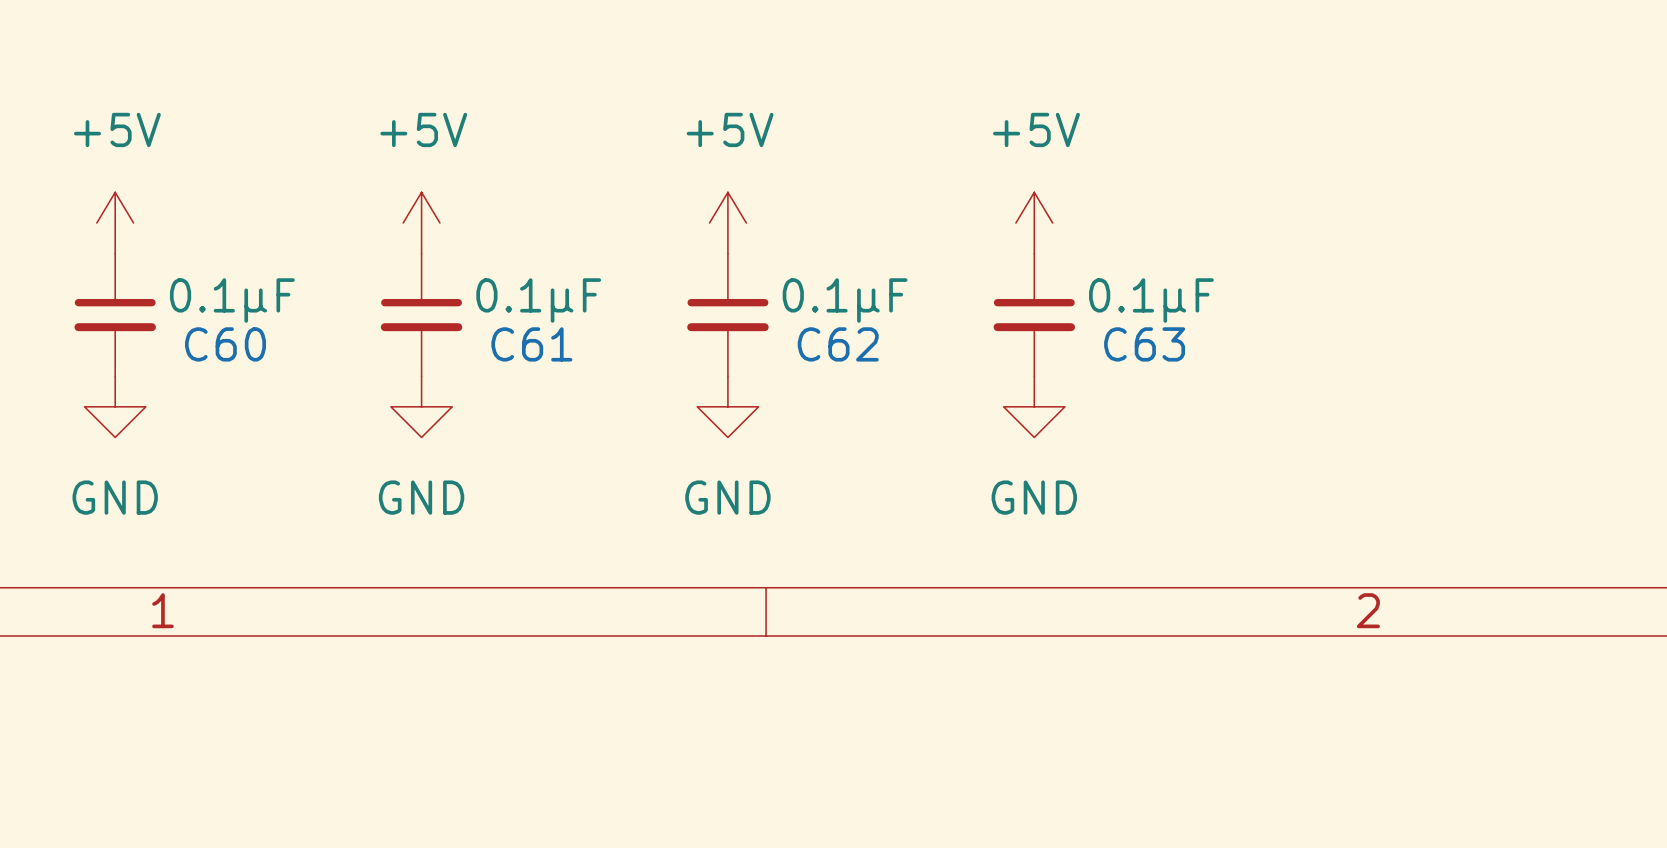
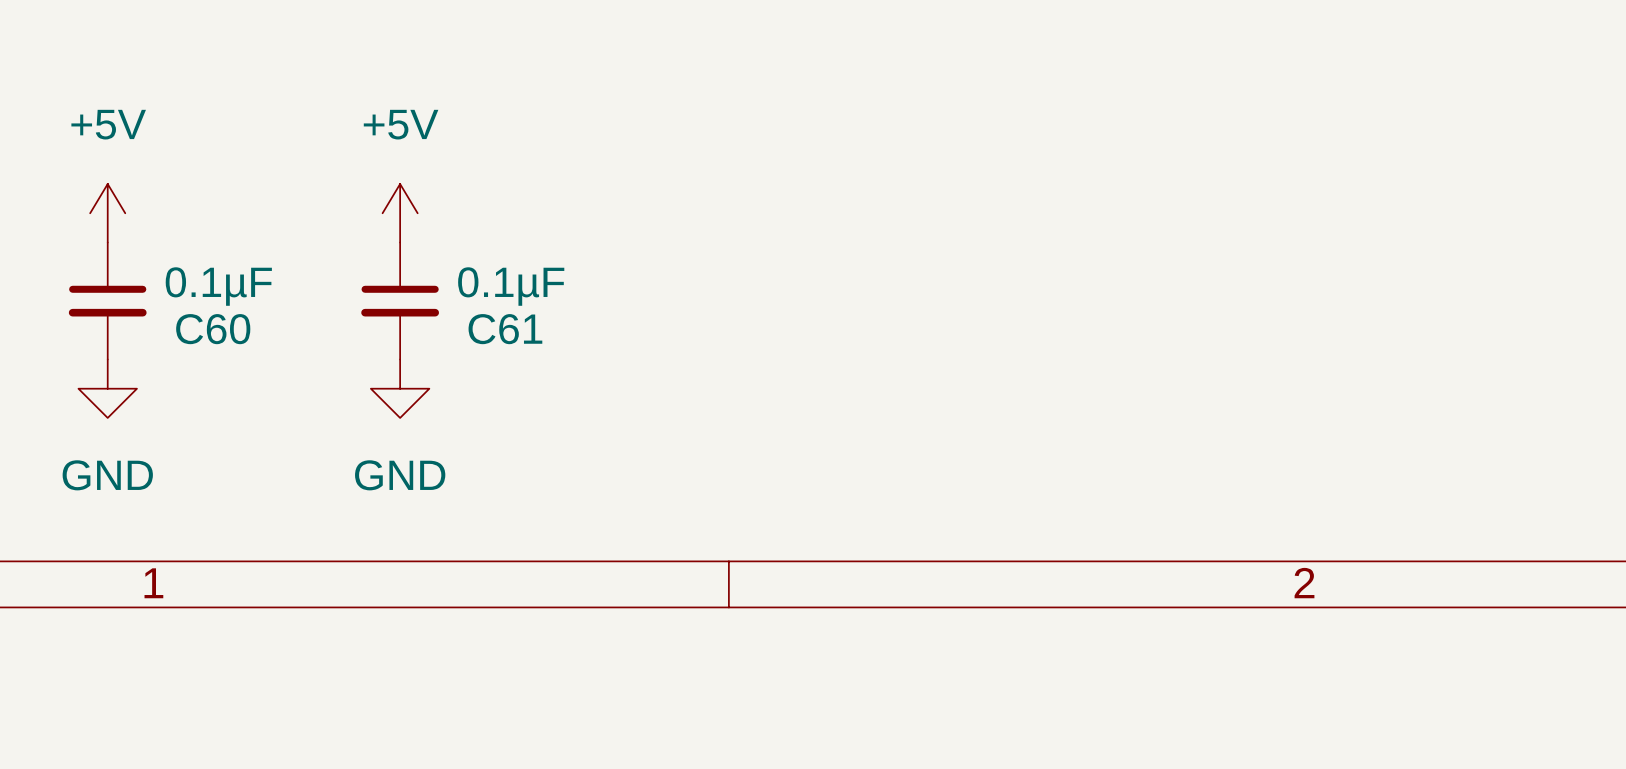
power symbol: +5V (727, 223) -> none
power symbol: +5V (1034, 223) -> none
C62: 0.1µF (727, 314) -> none
C63: 0.1µF (1034, 314) -> none
power symbol: GND (727, 406) -> none
power symbol: GND (1034, 406) -> none

